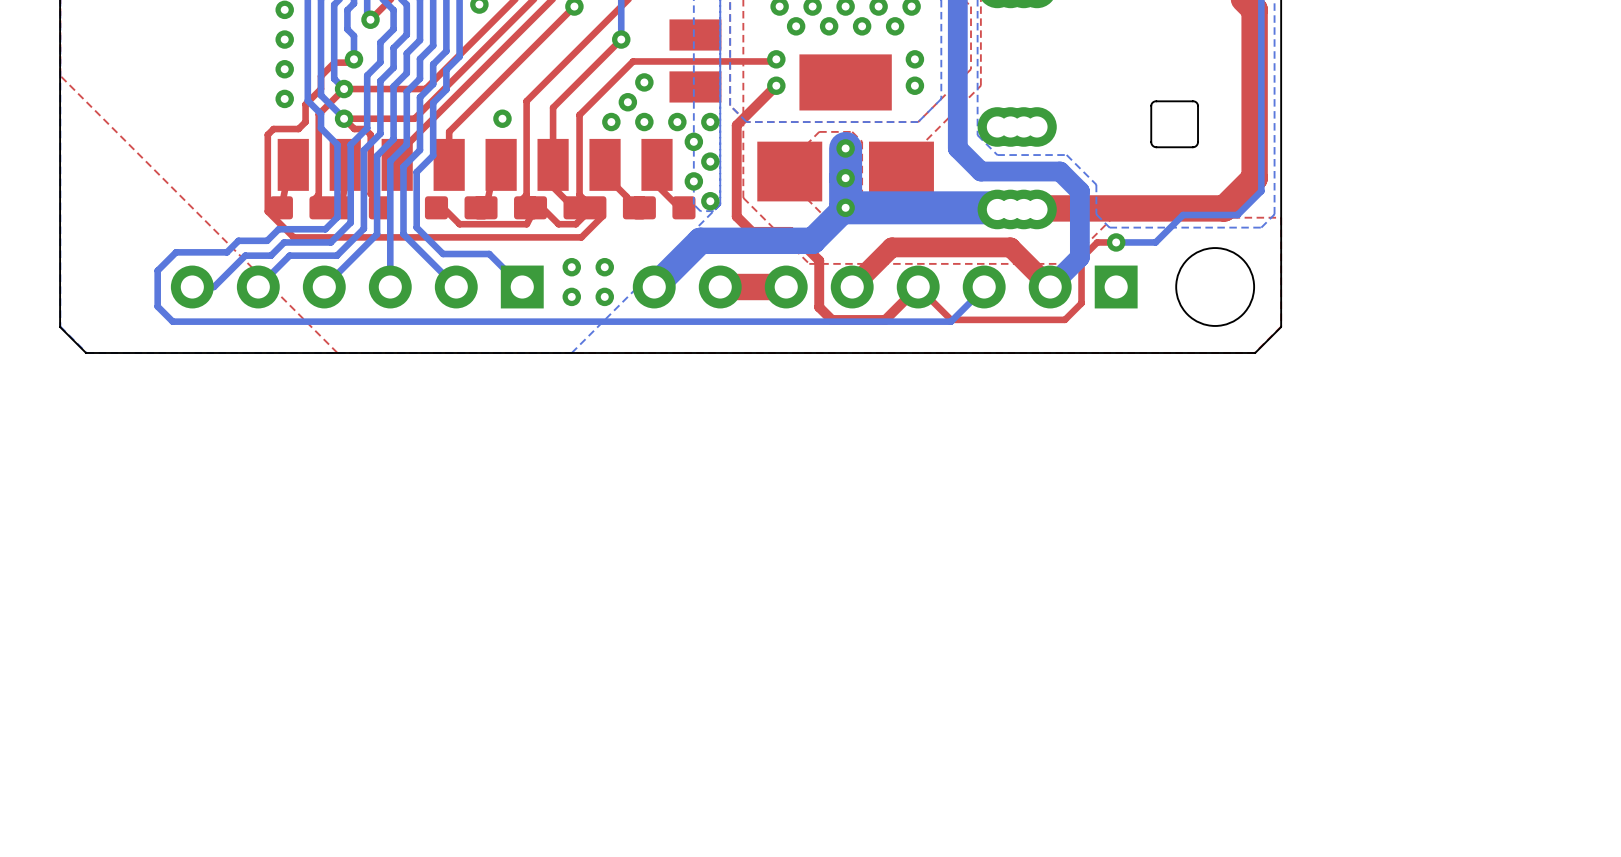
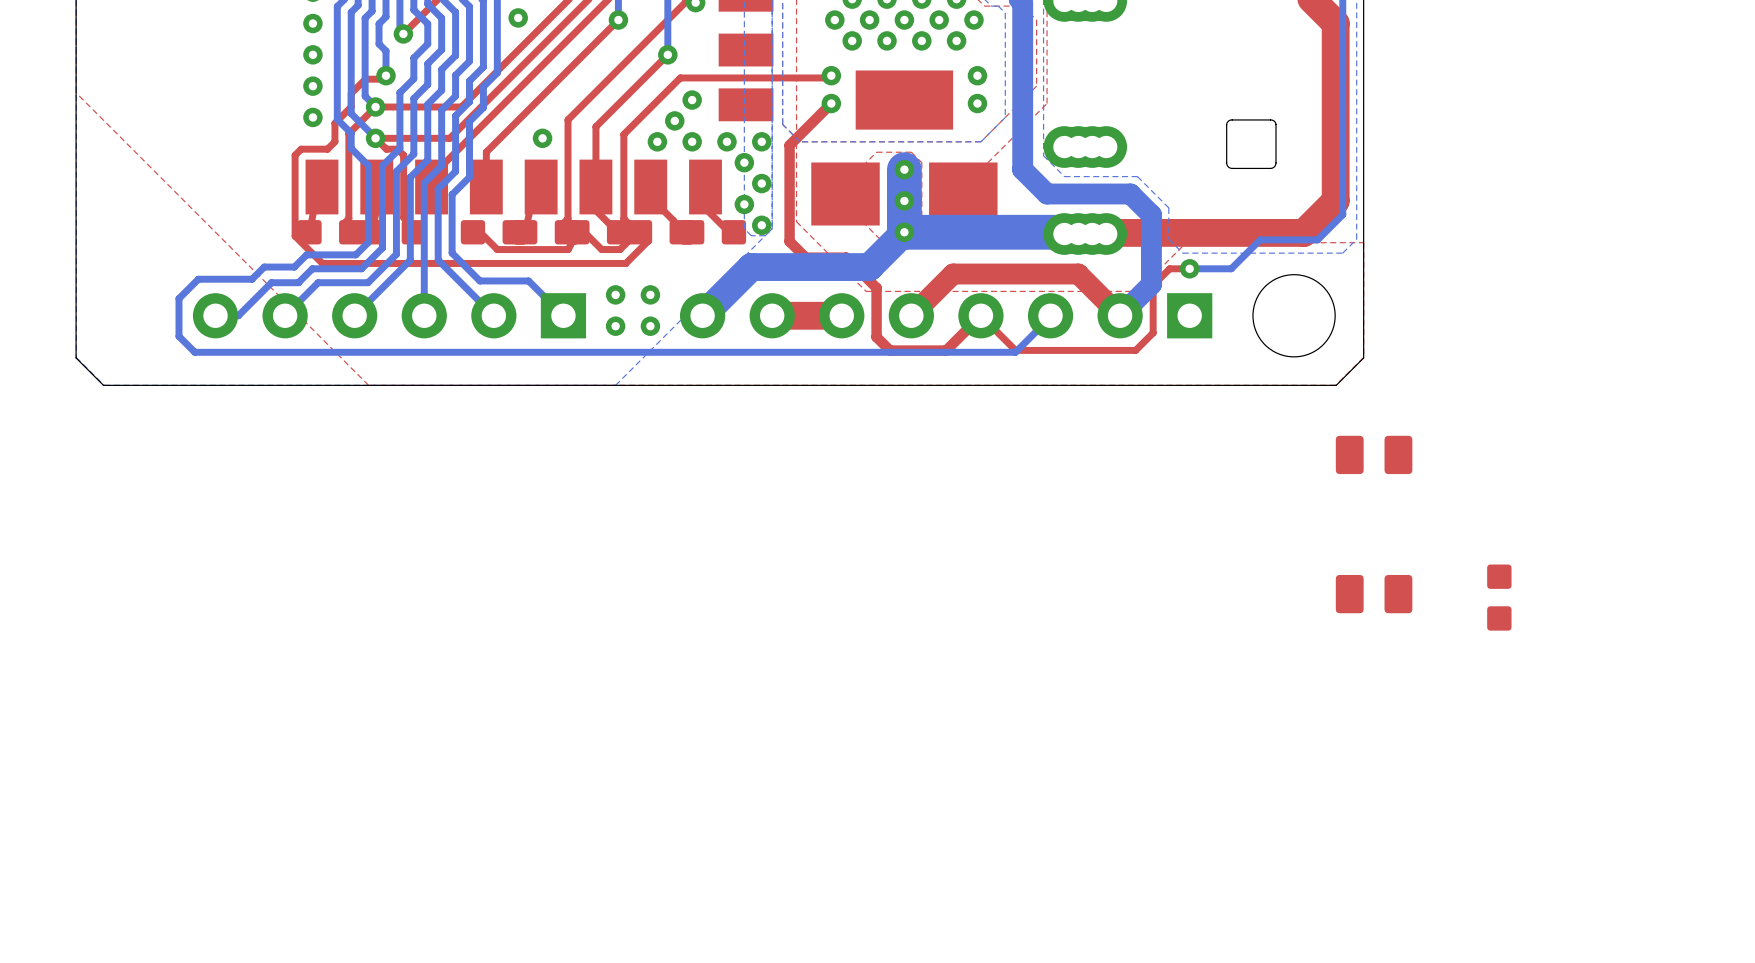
part: none -> (1374, 454)
part: none -> (1374, 594)
part: none -> (1499, 597)

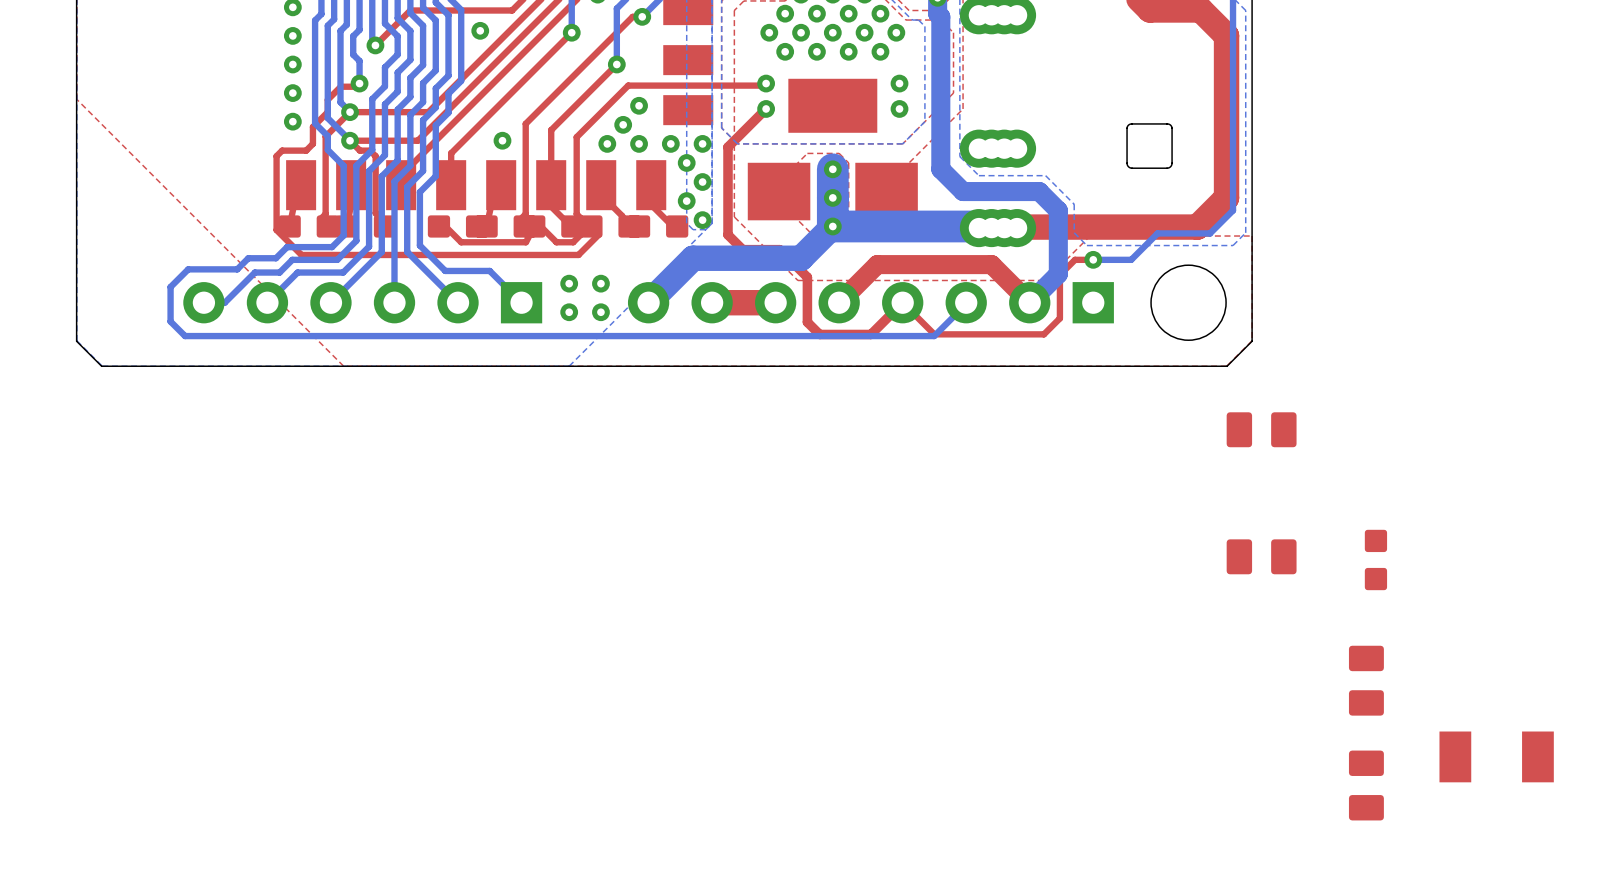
part: none -> (1366, 680)
part: none -> (1496, 756)
part: none -> (1366, 785)

